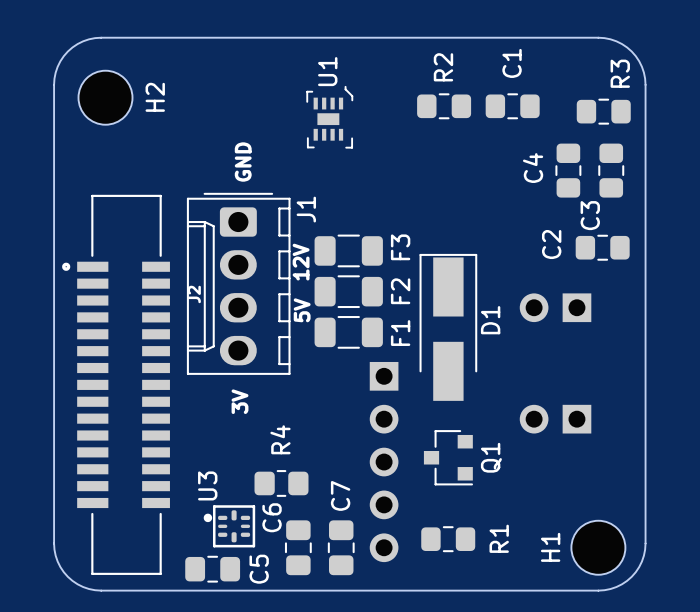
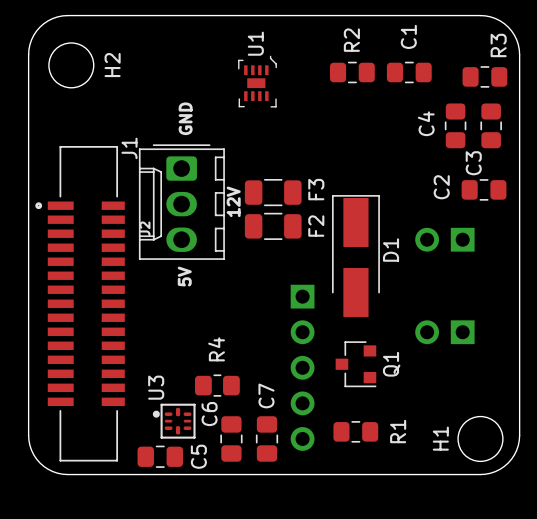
J1 footprint: [186, 192, 291, 375] -> [138, 144, 225, 260]
J1 name position: J1 (306, 209) -> J1 (129, 148)
text position: 5V (302, 310) -> 5V (184, 276)
F1: (348, 332) -> none
text: 3V (240, 401) -> none

